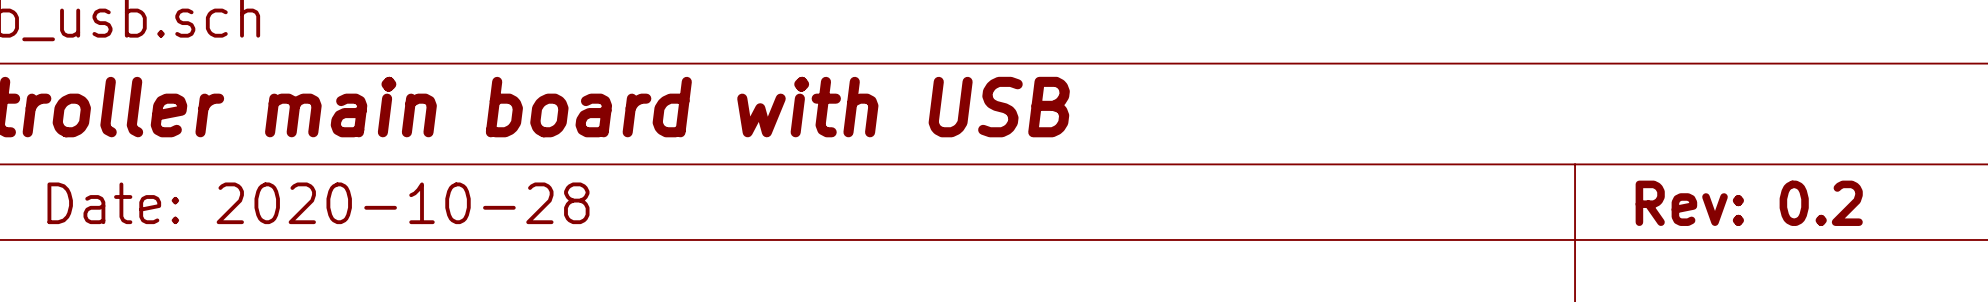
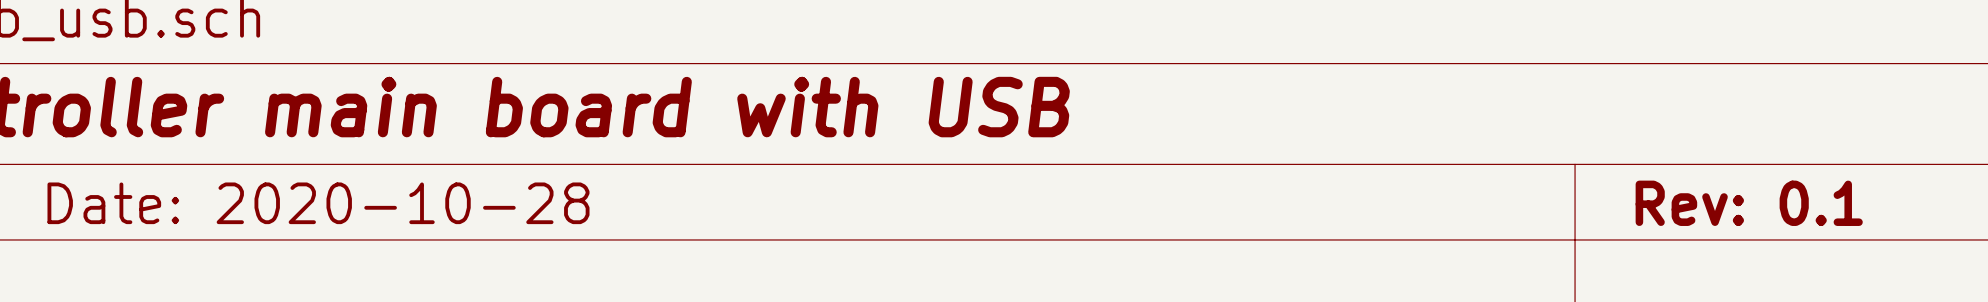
title block: Rev: 0.2 (1749, 203) -> Rev: 0.1 (1749, 203)

